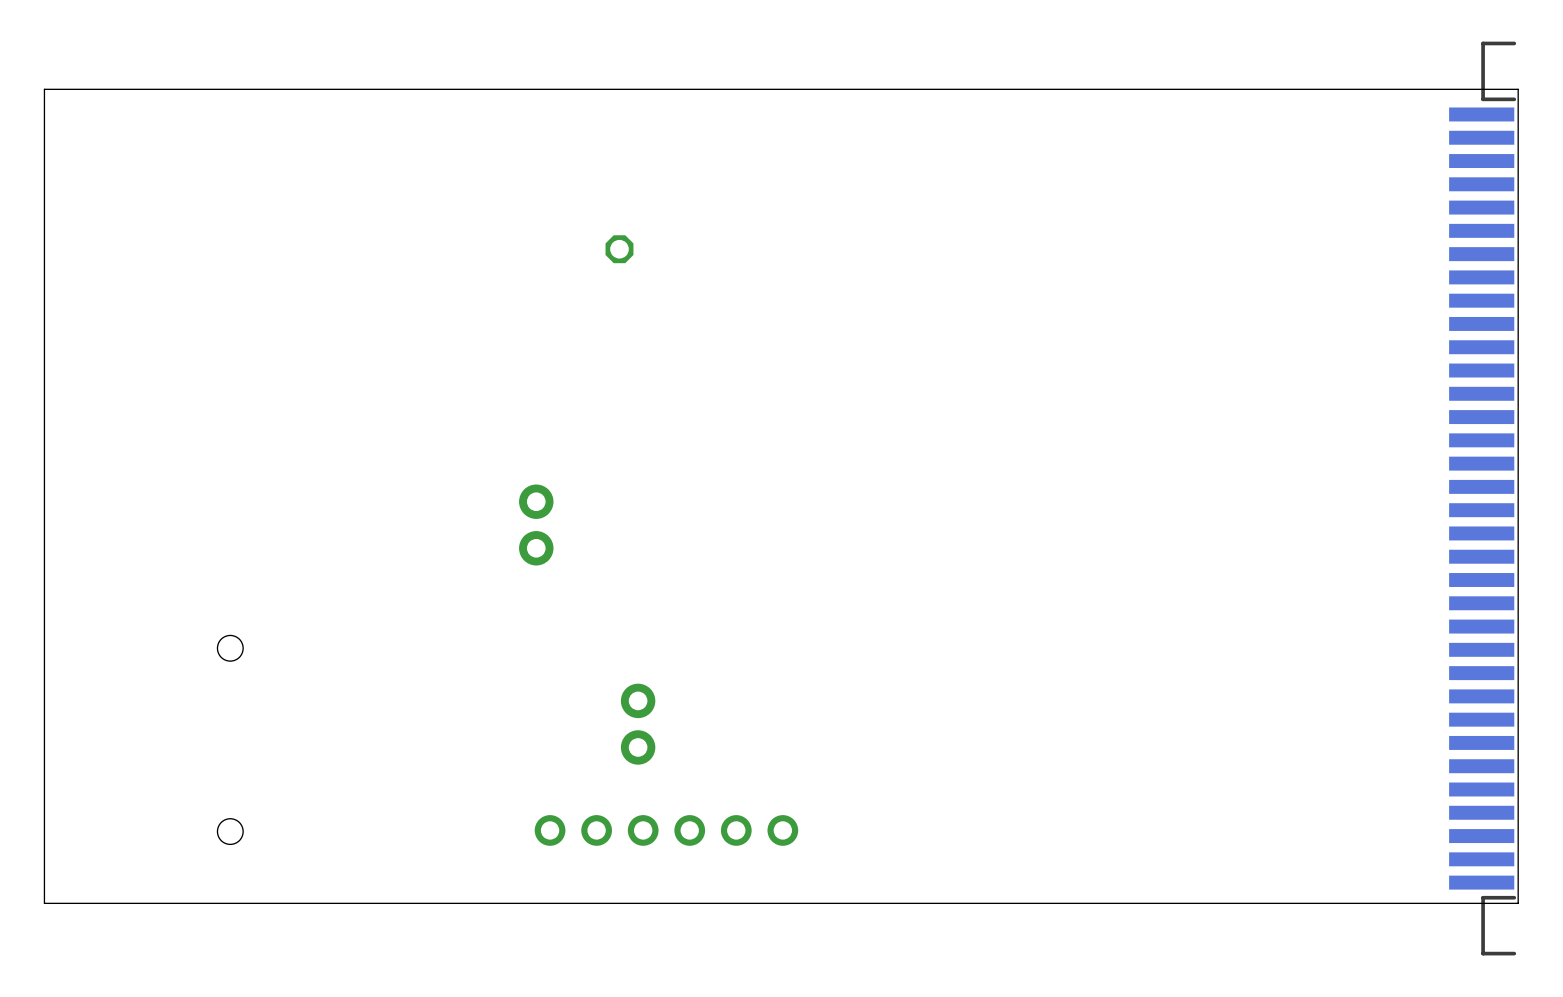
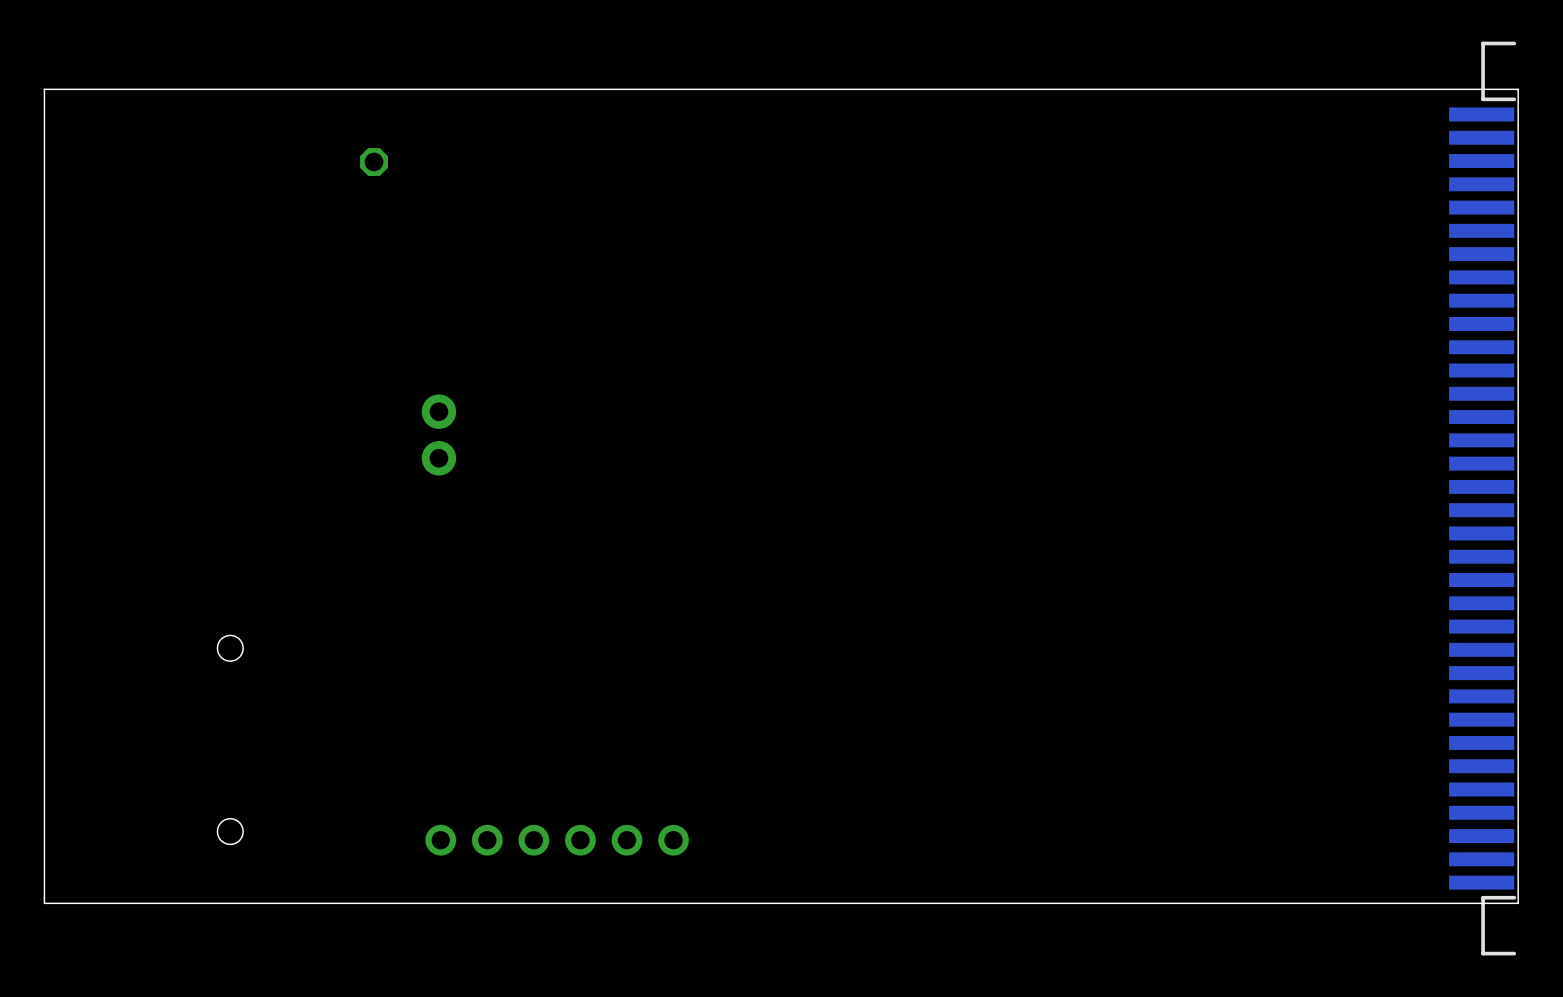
part position: (619, 249) -> (374, 161)
part position: (536, 525) -> (438, 435)
part: (638, 724) -> none
part position: (666, 830) -> (557, 840)

